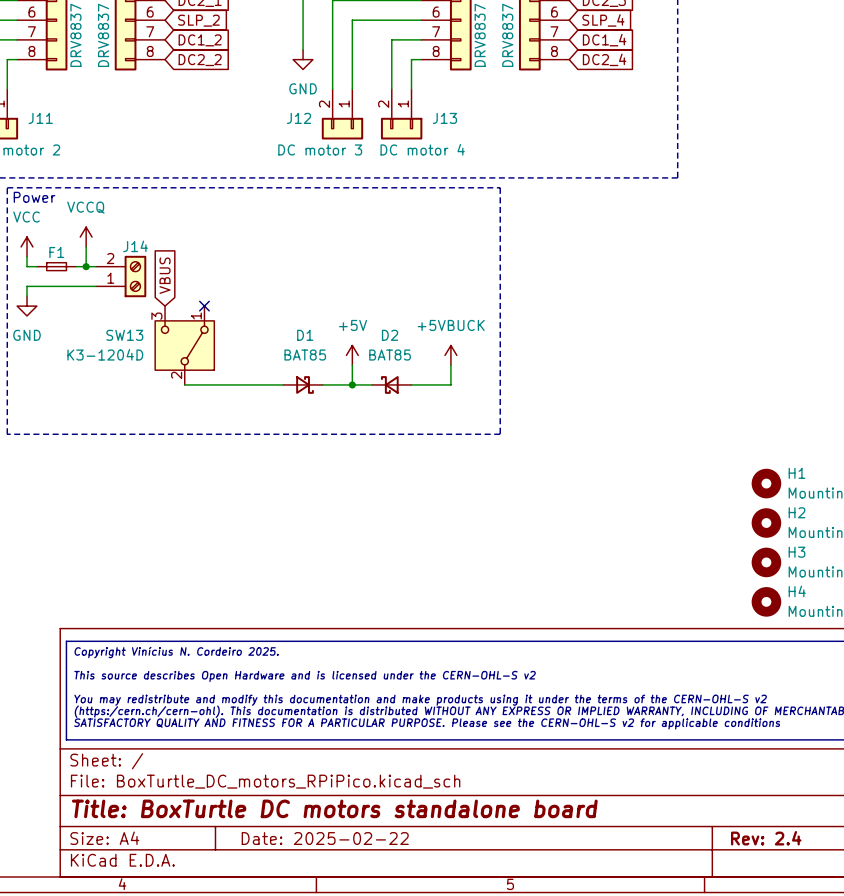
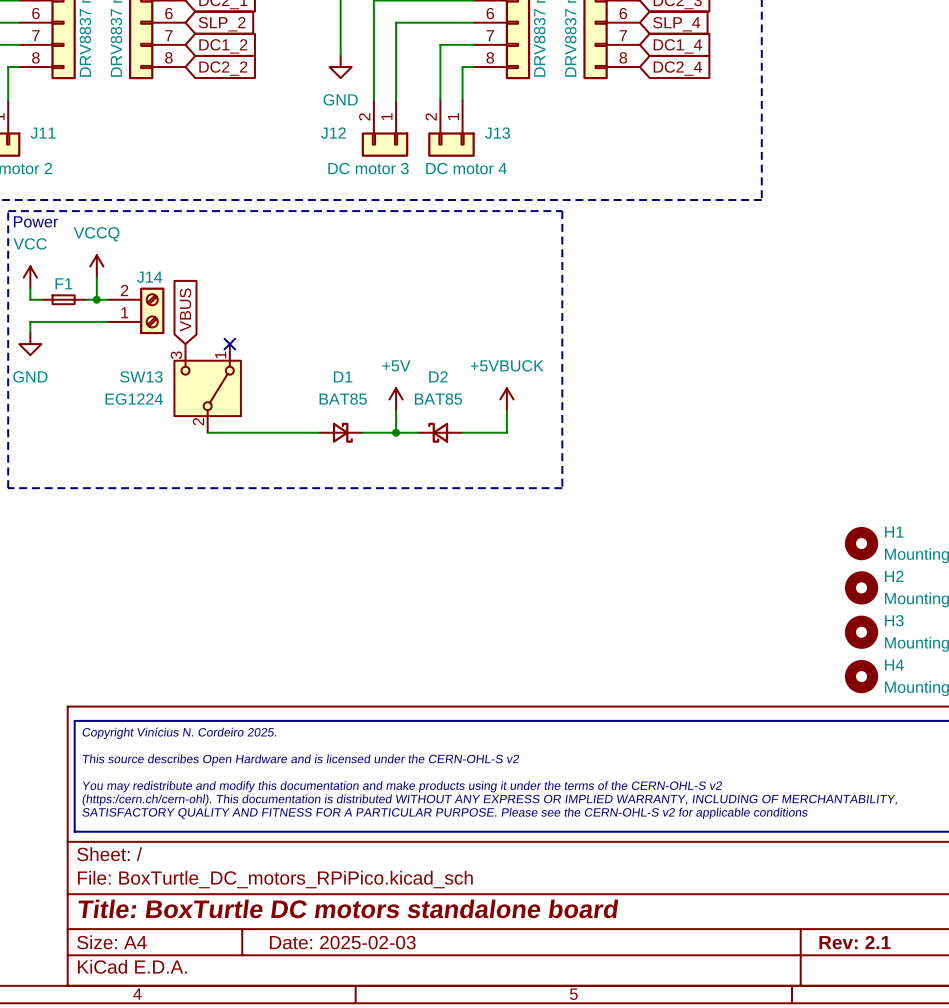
SW13 value: K3-1204D (105, 354) -> EG1224 (134, 399)
title block: Date: 2025-02-22 (325, 838) -> Date: 2025-02-03 (342, 942)
title block: Rev: 2.4 (766, 838) -> Rev: 2.1 (855, 942)

